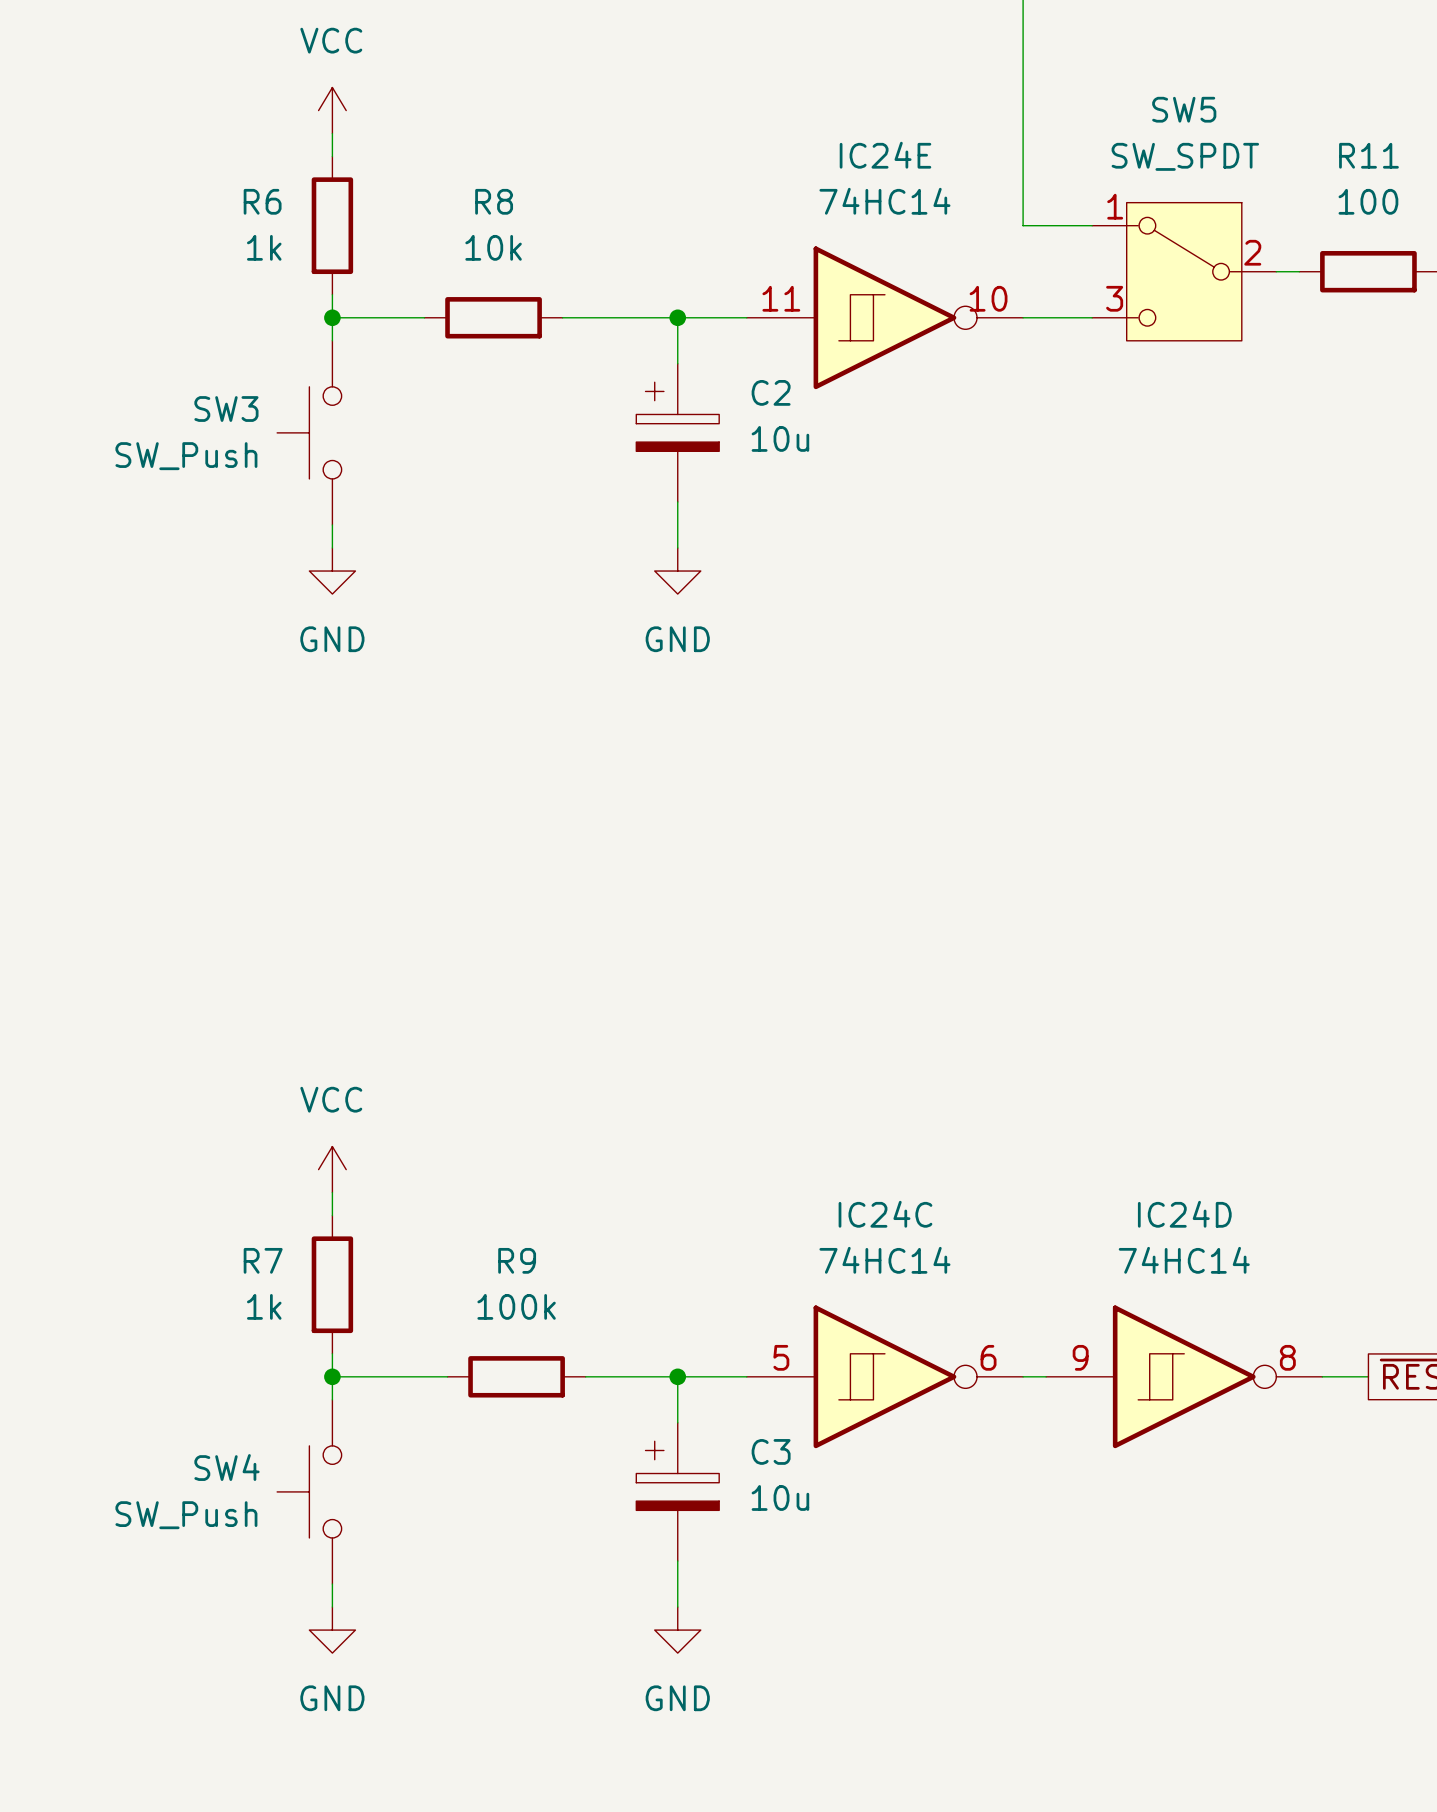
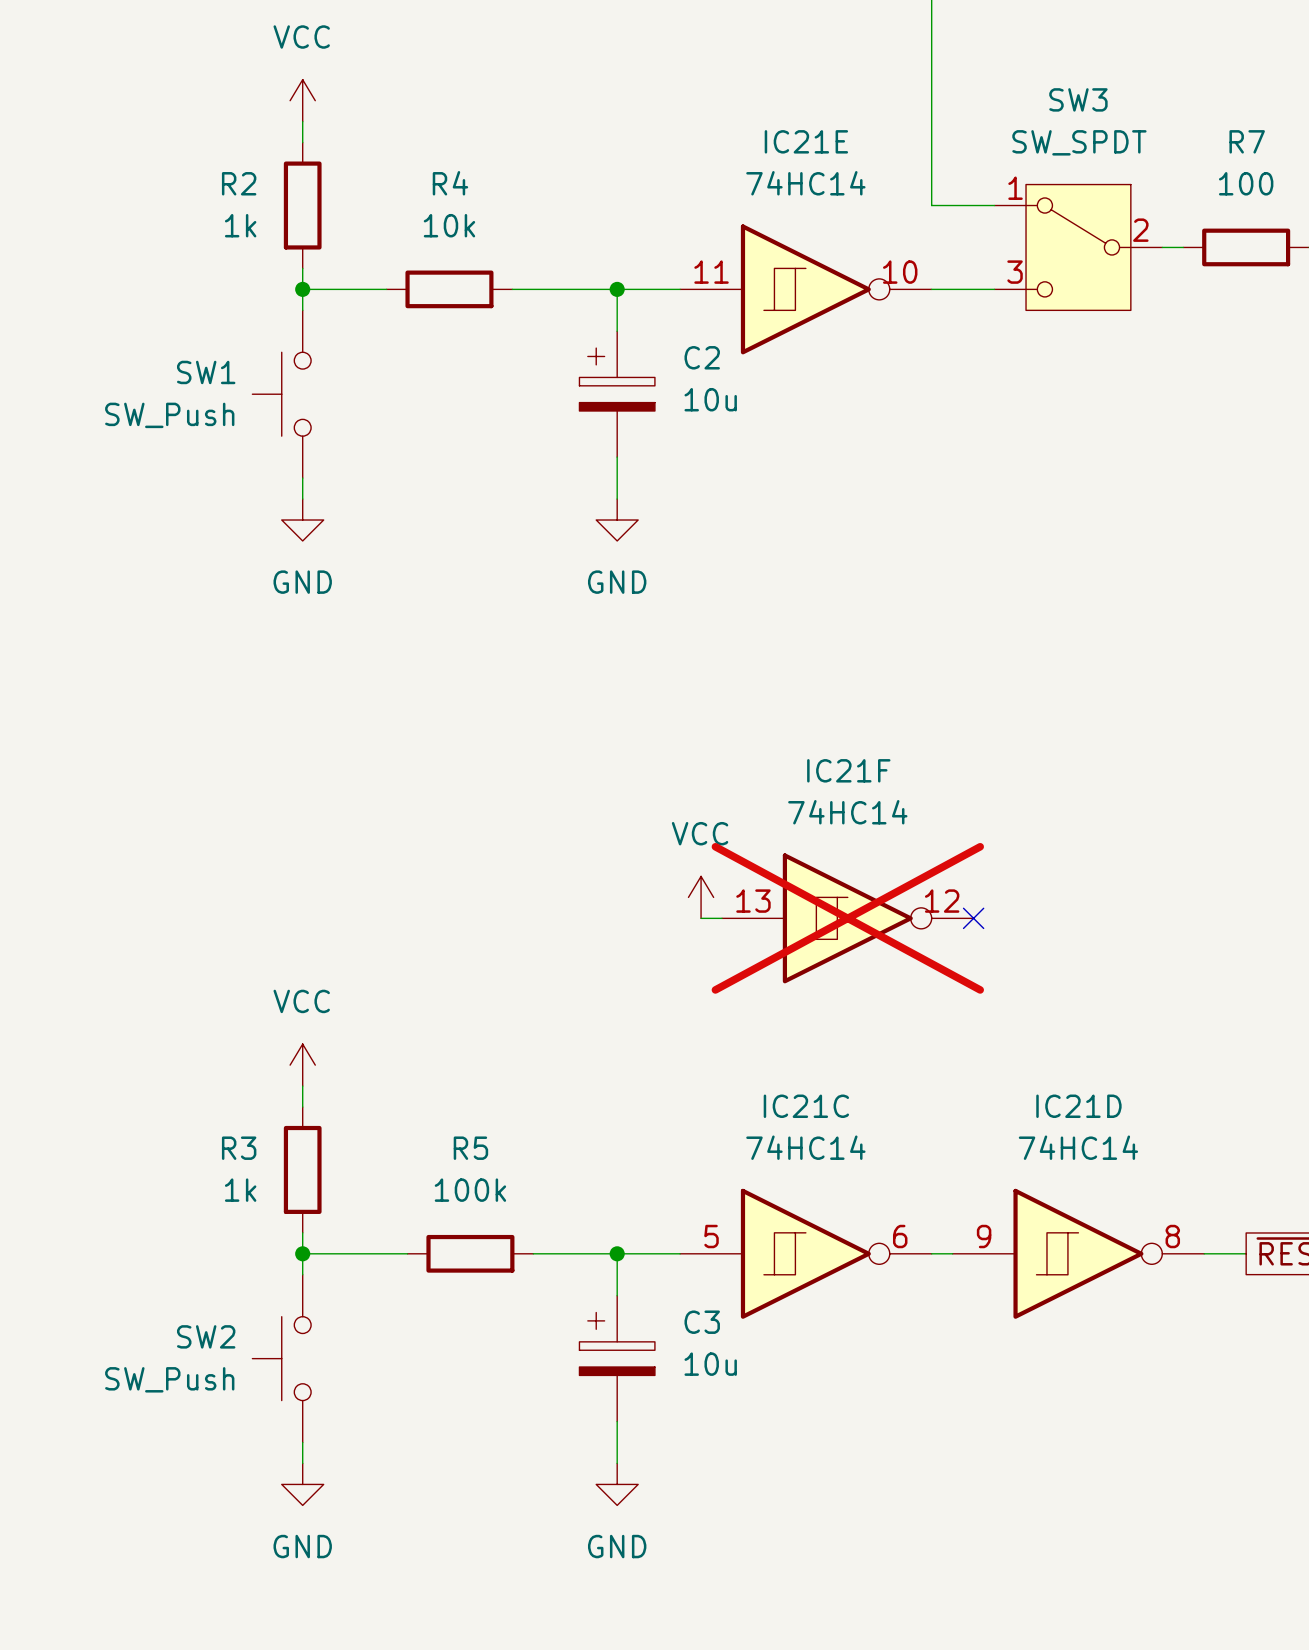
SW5 name: SW5 (1184, 109) -> SW3 (1078, 99)
IC24E name: IC24E (885, 155) -> IC21E (806, 141)
R11 name: R11 (1368, 155) -> R7 (1247, 141)
R6 name: R6 (262, 201) -> R2 (239, 183)
R8 name: R8 (494, 201) -> R4 (450, 183)
SW3 name: SW3 (226, 409) -> SW1 (206, 372)
power symbol: none -> VCC (701, 897)
wire: none -> (701, 918) (722, 918)
IC21F: none -> 74HC14 (847, 918)
no-connect mark: none -> (973, 918)
IC24C name: IC24C (885, 1214) -> IC21C (806, 1106)
IC24D name: IC24D (1184, 1214) -> IC21D (1078, 1106)
R7 name: R7 (263, 1260) -> R3 (239, 1148)
R9 name: R9 (517, 1260) -> R5 (470, 1148)
SW4 name: SW4 (226, 1467) -> SW2 (206, 1336)

